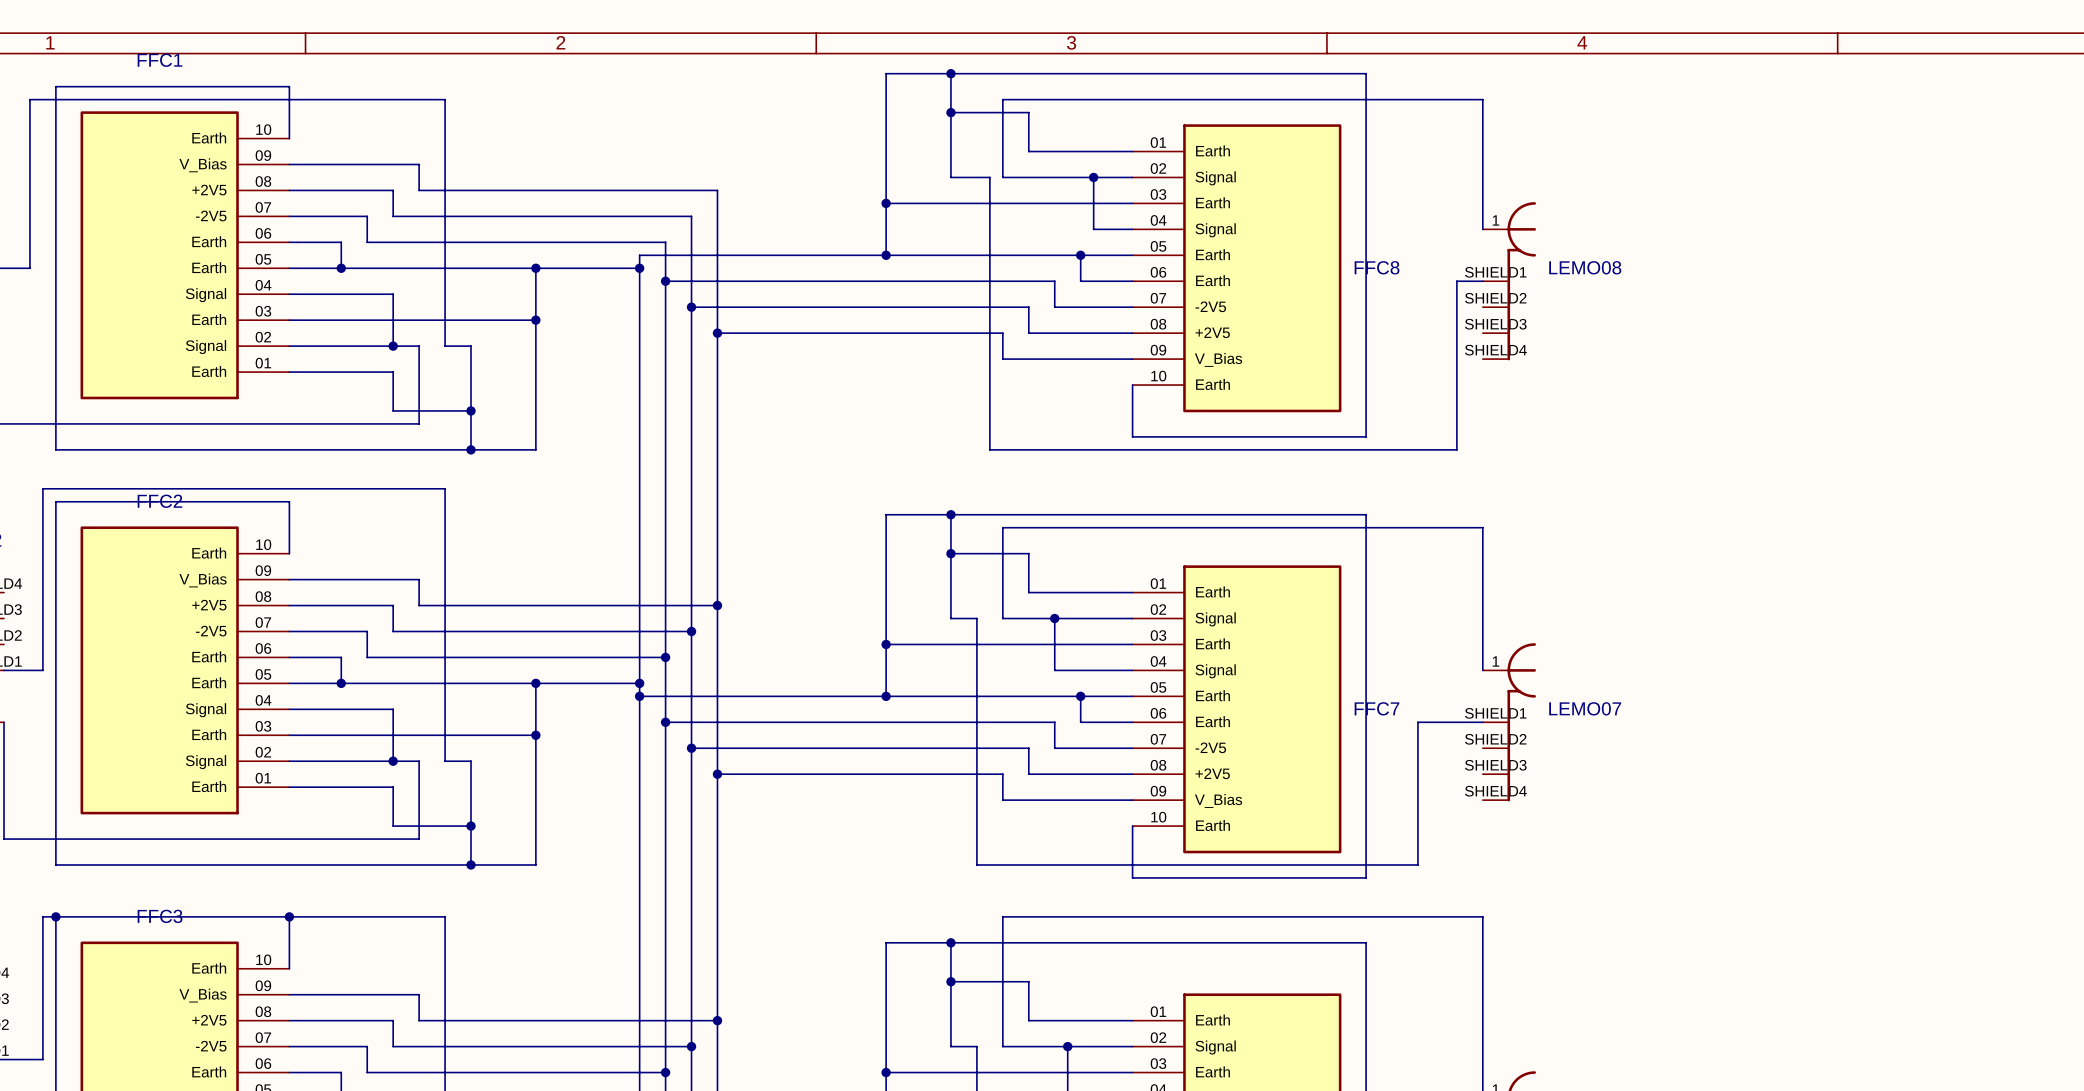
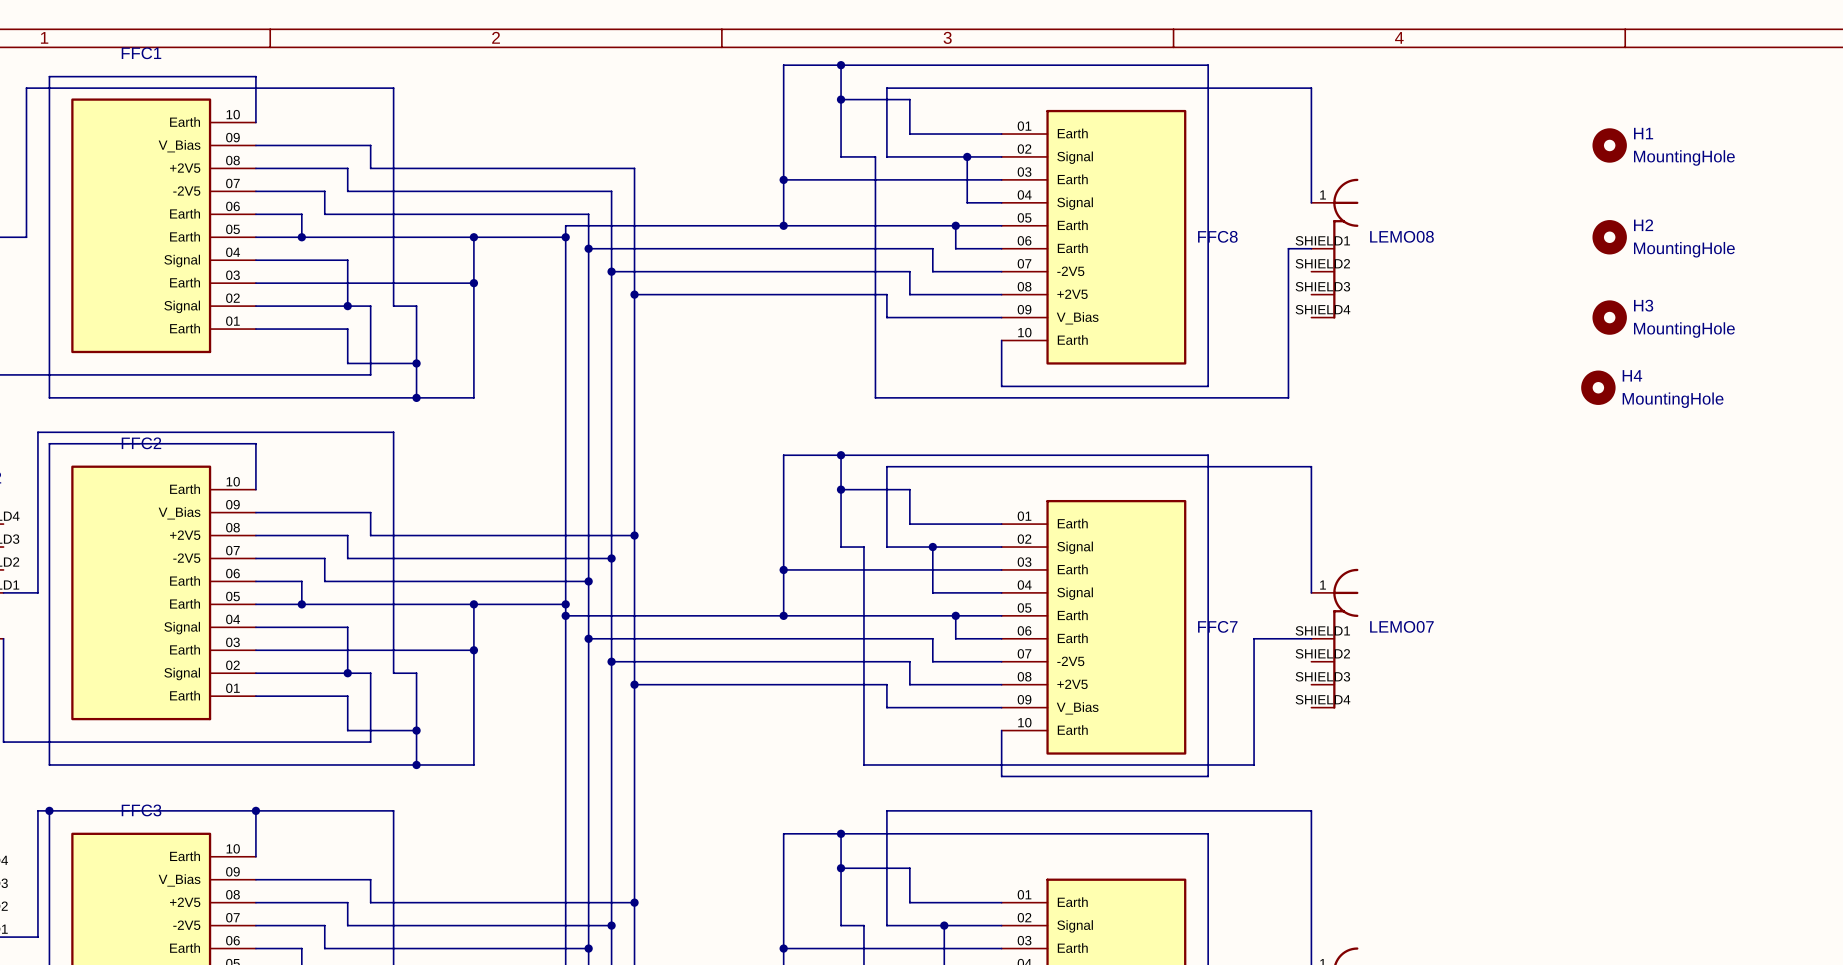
H1: none -> MountingHole (1609, 145)
H2: none -> MountingHole (1609, 237)
H3: none -> MountingHole (1609, 317)
H4: none -> MountingHole (1598, 387)

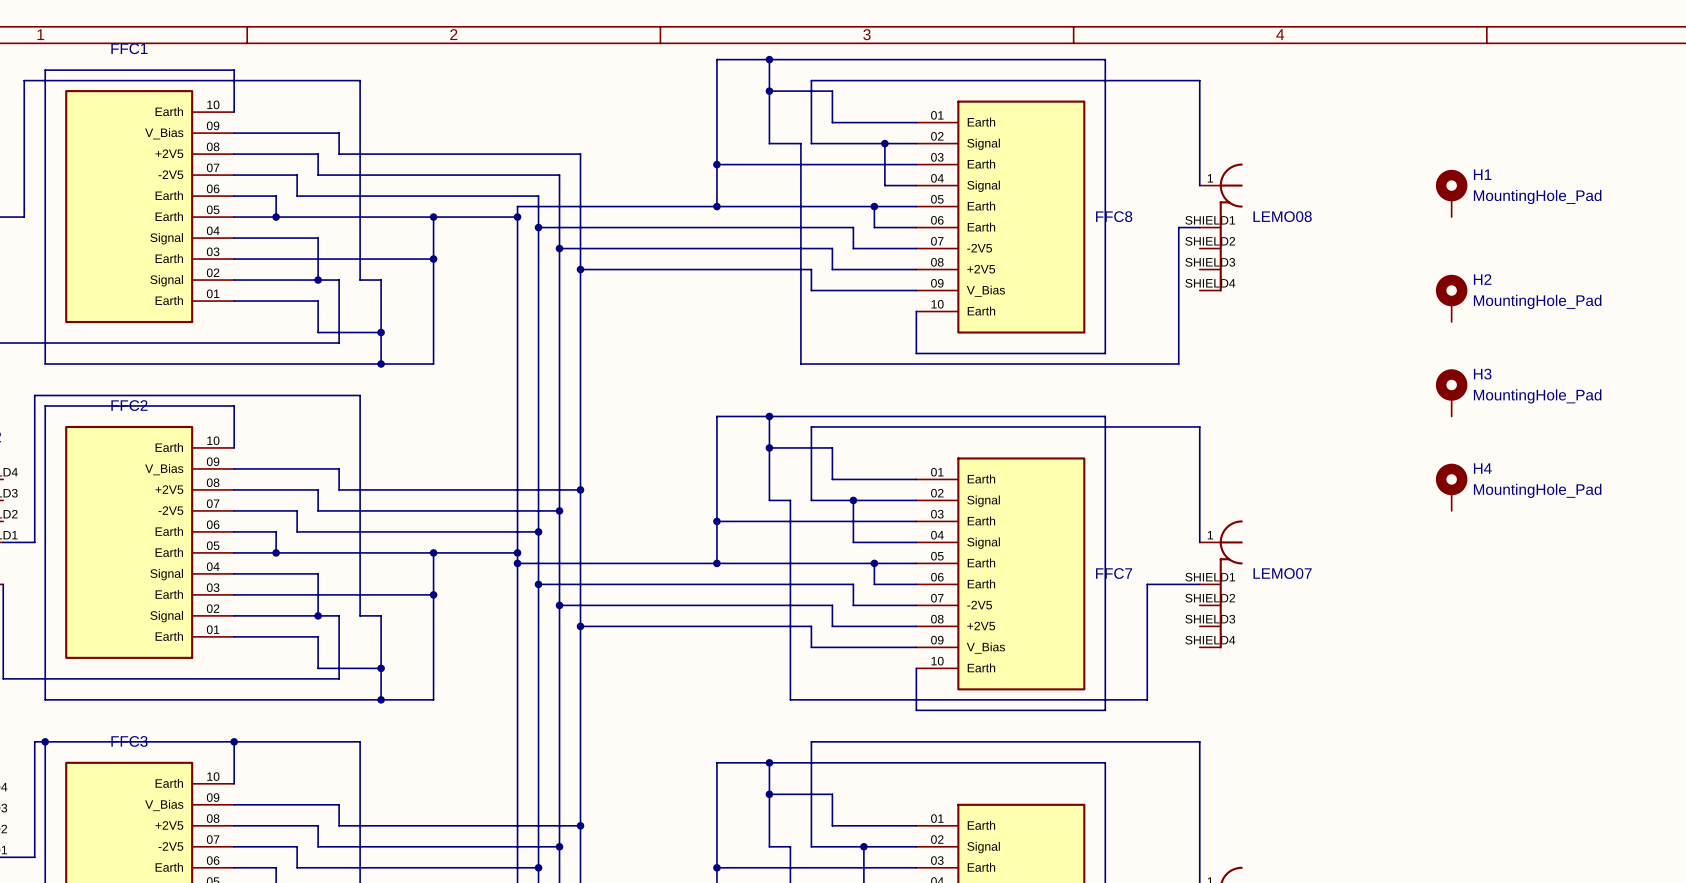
H1 symbol: [1592, 128, 1627, 163] -> [1435, 169, 1468, 218]
H1 value: MountingHole (1684, 157) -> MountingHole_Pad (1537, 196)
H2 symbol: [1592, 220, 1627, 255] -> [1435, 274, 1468, 323]
H2 value: MountingHole (1684, 249) -> MountingHole_Pad (1537, 301)
H3 symbol: [1592, 300, 1627, 335] -> [1435, 369, 1468, 417]
H3 value: MountingHole (1684, 330) -> MountingHole_Pad (1537, 396)
H4 symbol: [1581, 370, 1616, 405] -> [1435, 463, 1468, 511]
H4 value: MountingHole (1673, 400) -> MountingHole_Pad (1537, 490)

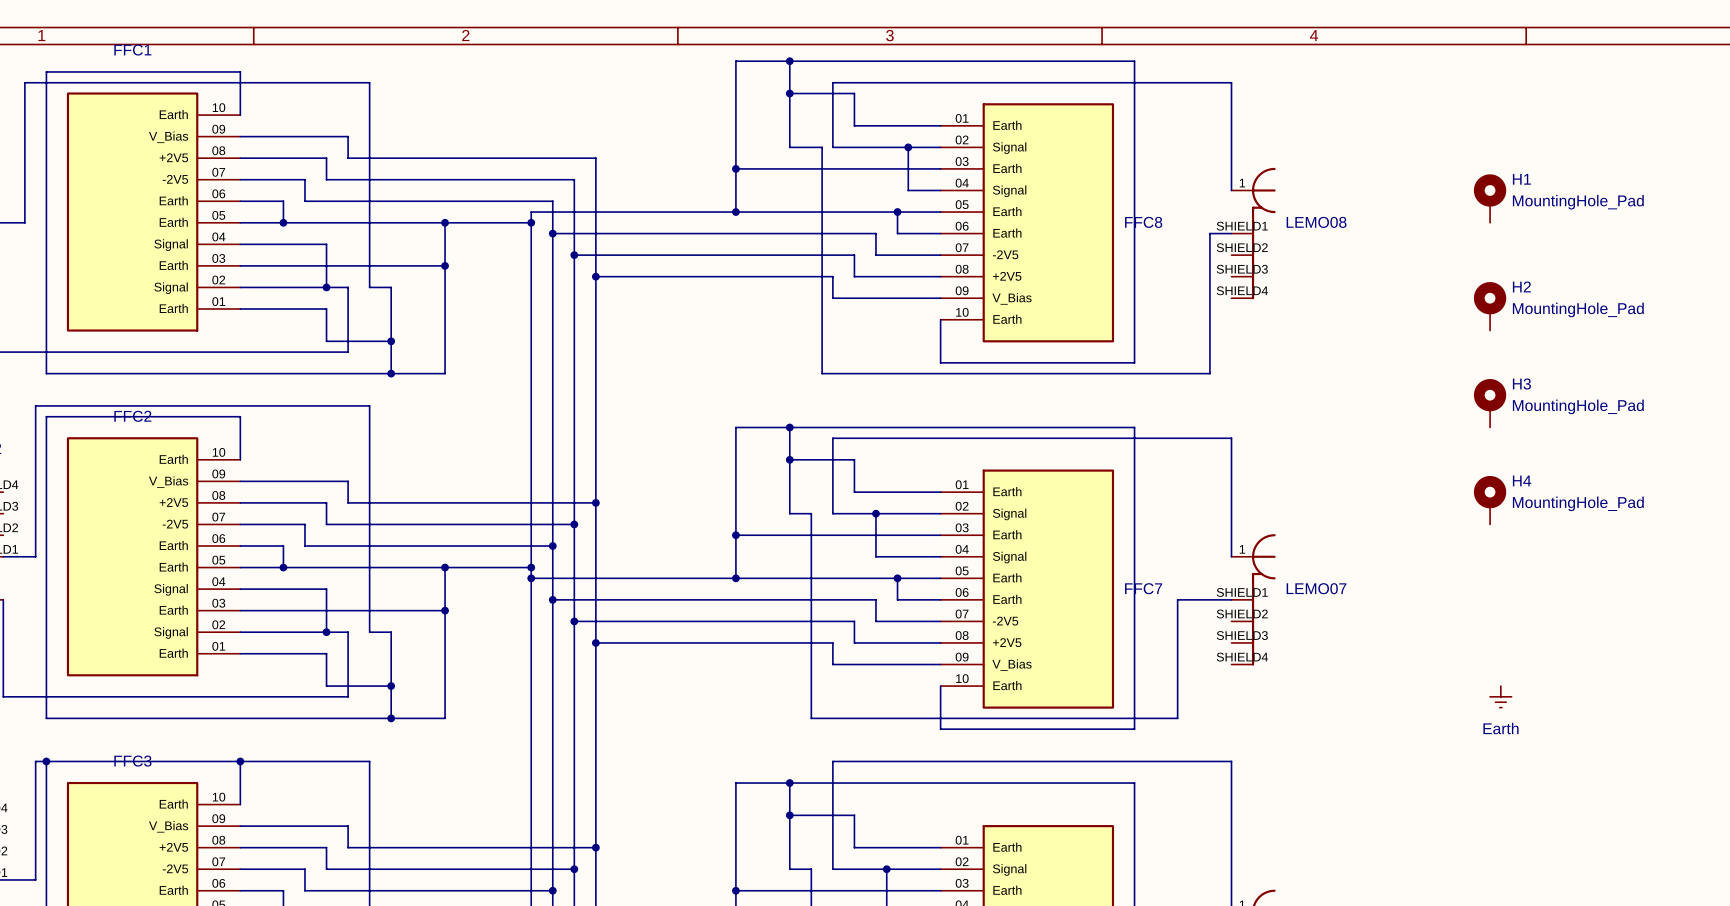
power symbol: none -> Earth (1500, 696)

